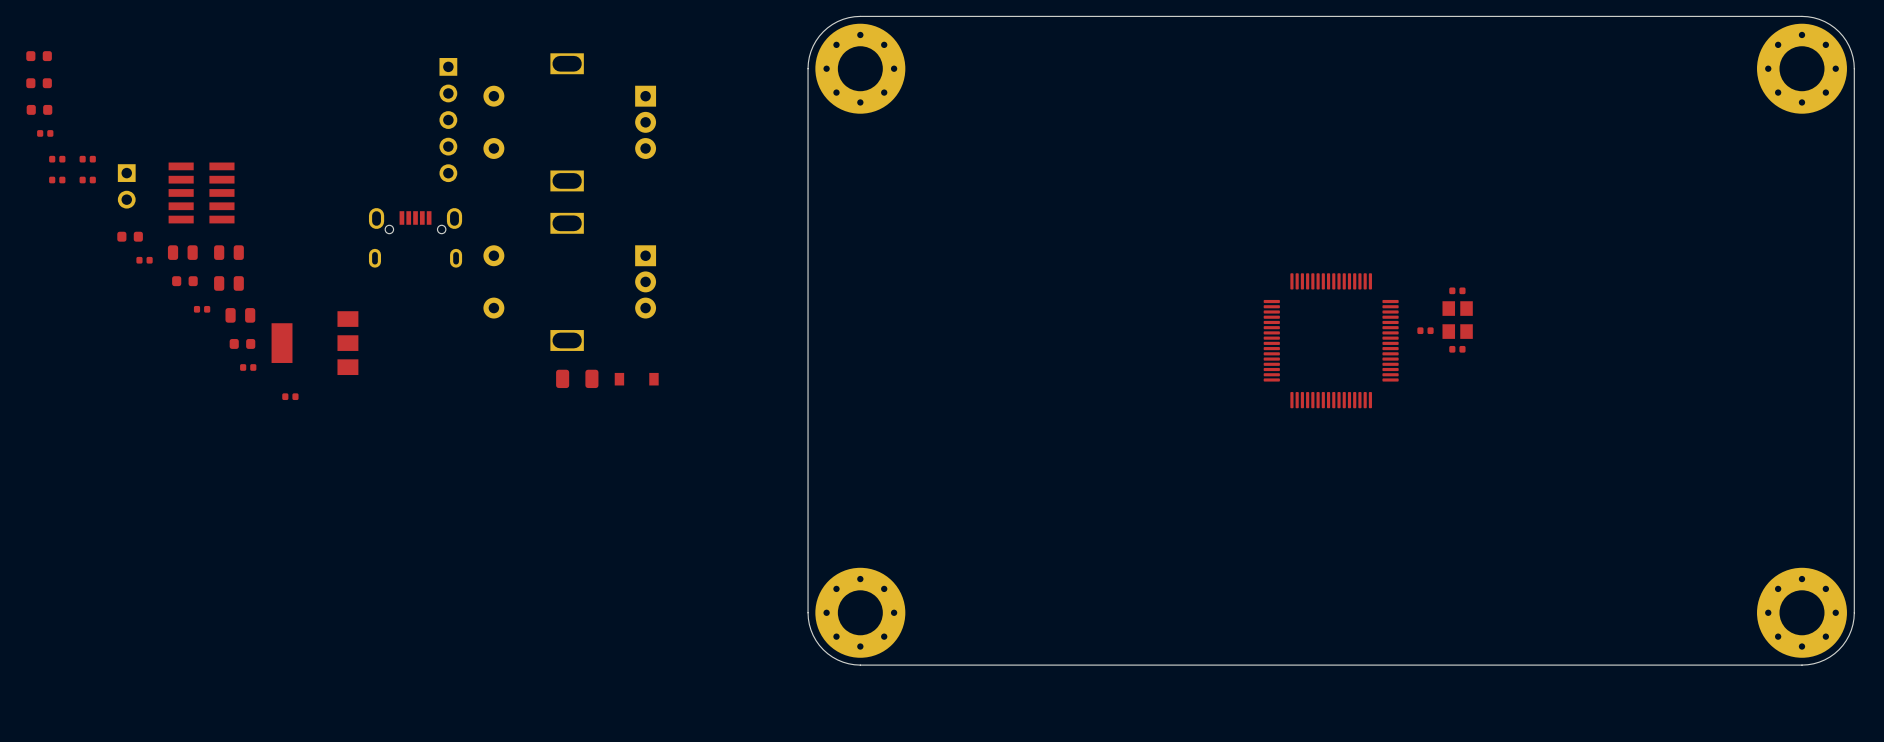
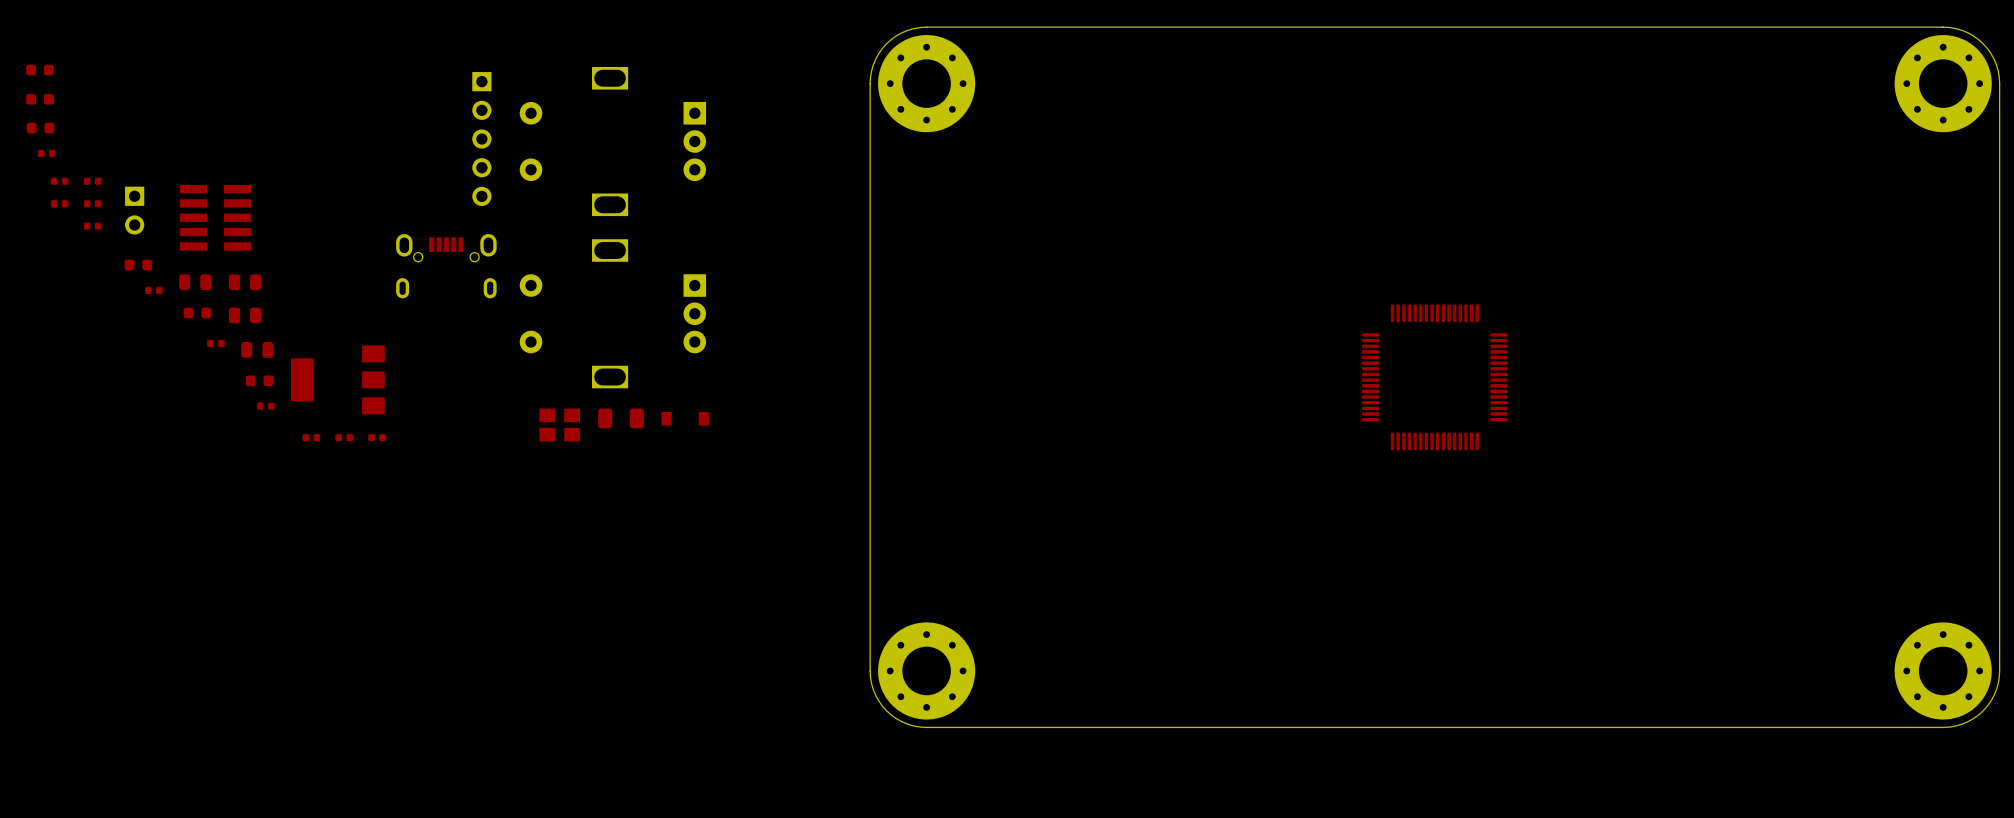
part: none -> (92, 226)
part: (1457, 290) -> none
part: (1457, 320) -> none
part: (1425, 330) -> none
part: (1457, 349) -> none
part: none -> (559, 425)
part: none -> (344, 437)
part: none -> (377, 437)

